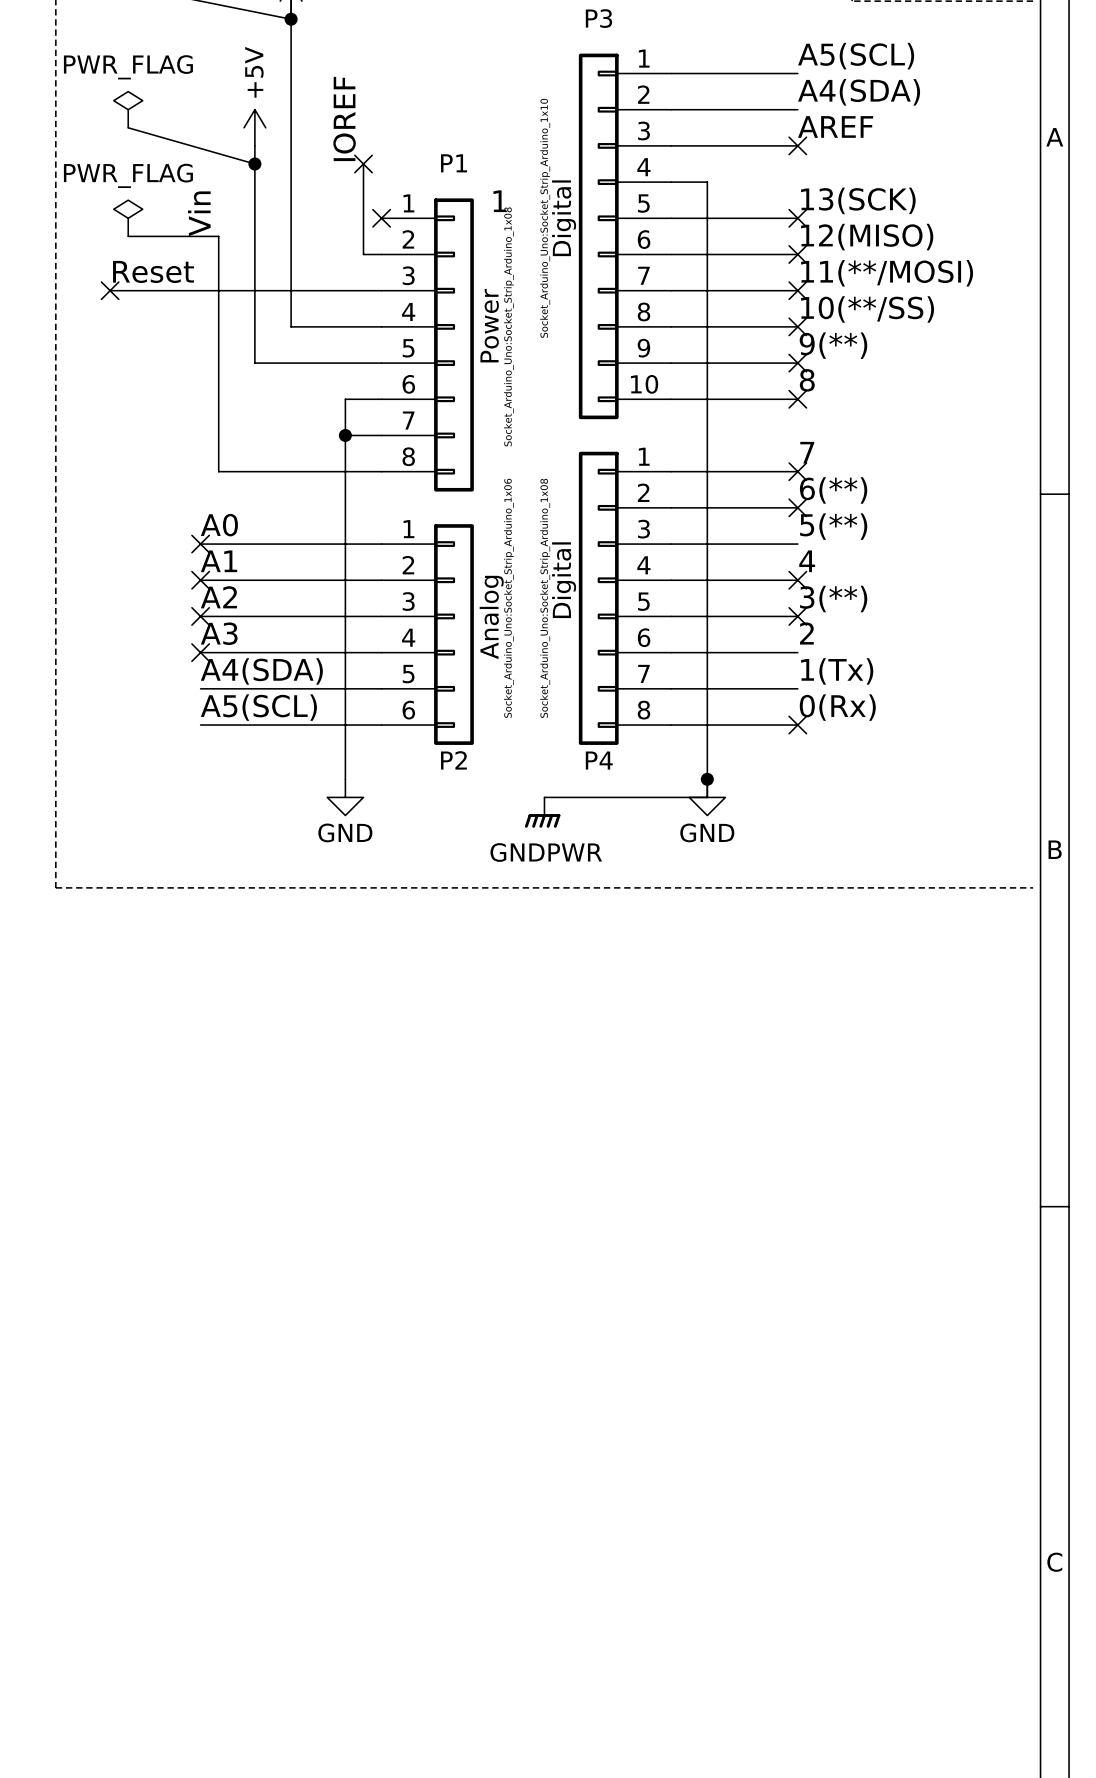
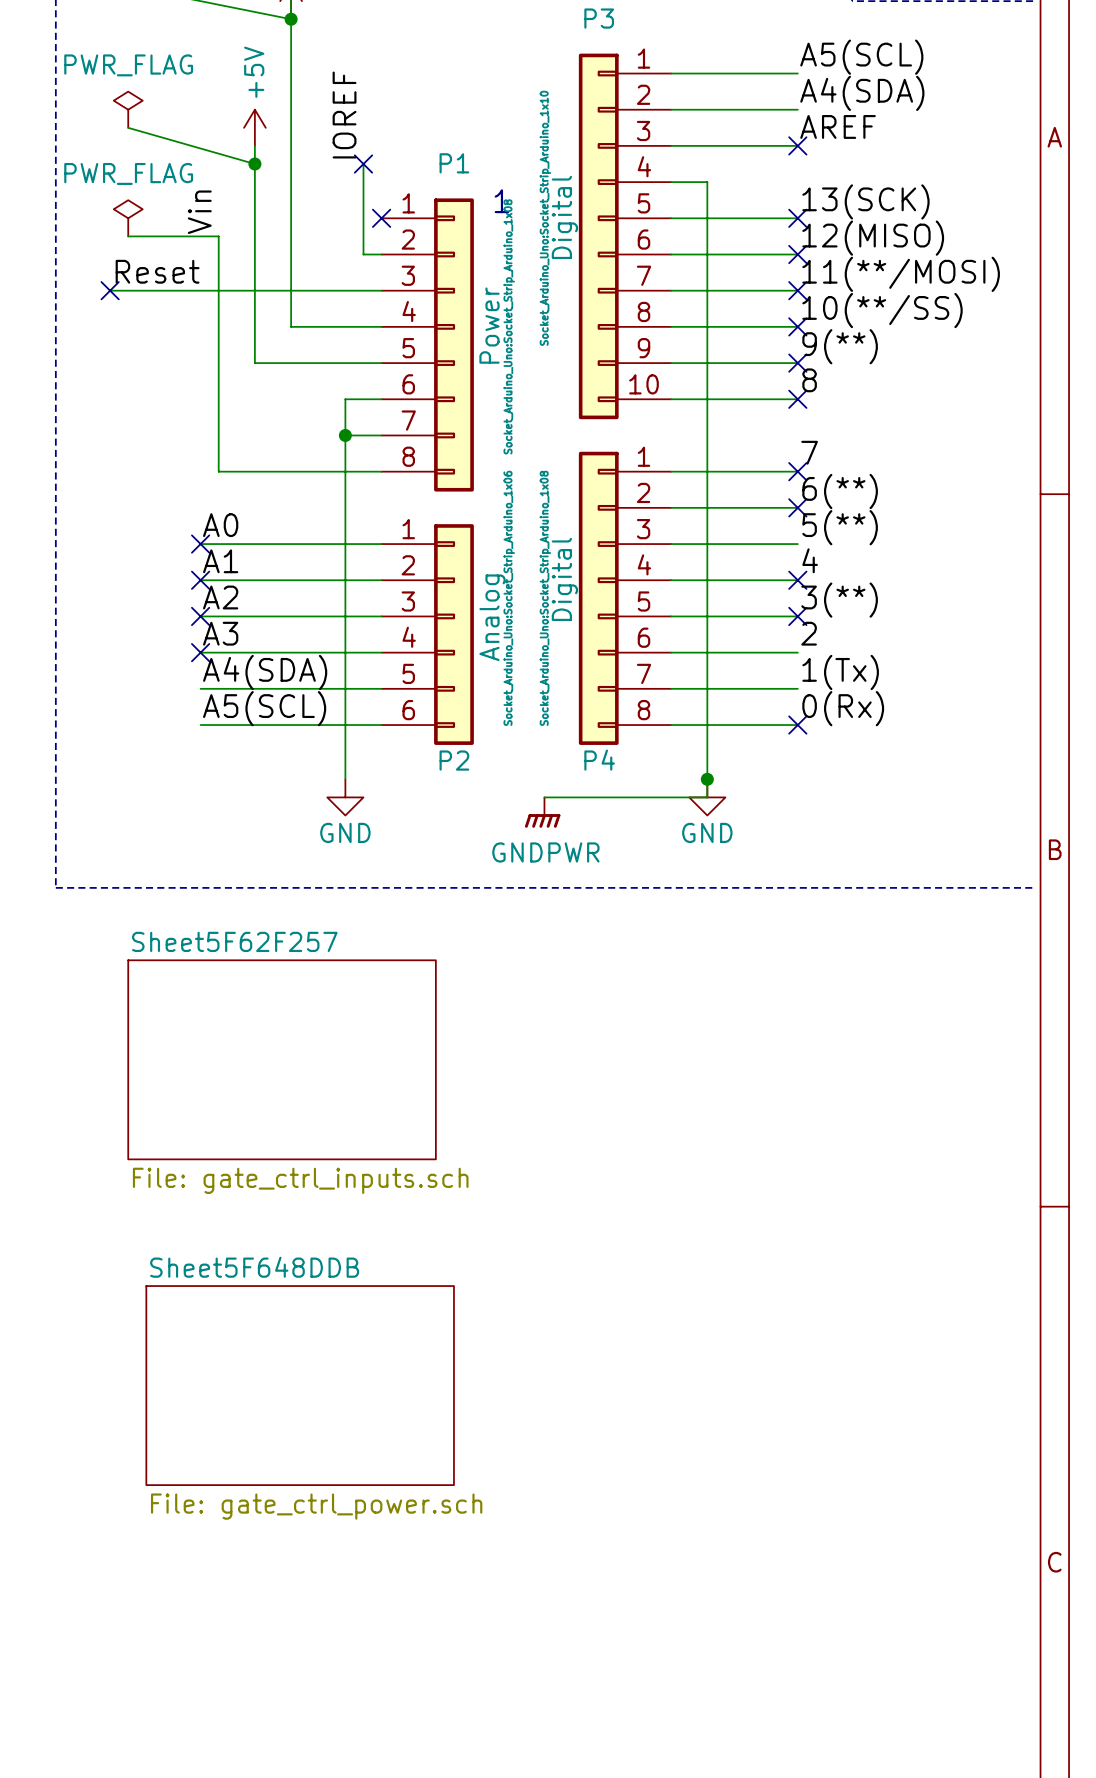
sheet Sheet5F62F257: none -> File: gate_ctrl_inputs.sch (282, 1059)
sheet Sheet5F648DDB: none -> File: gate_ctrl_power.sch (300, 1385)

